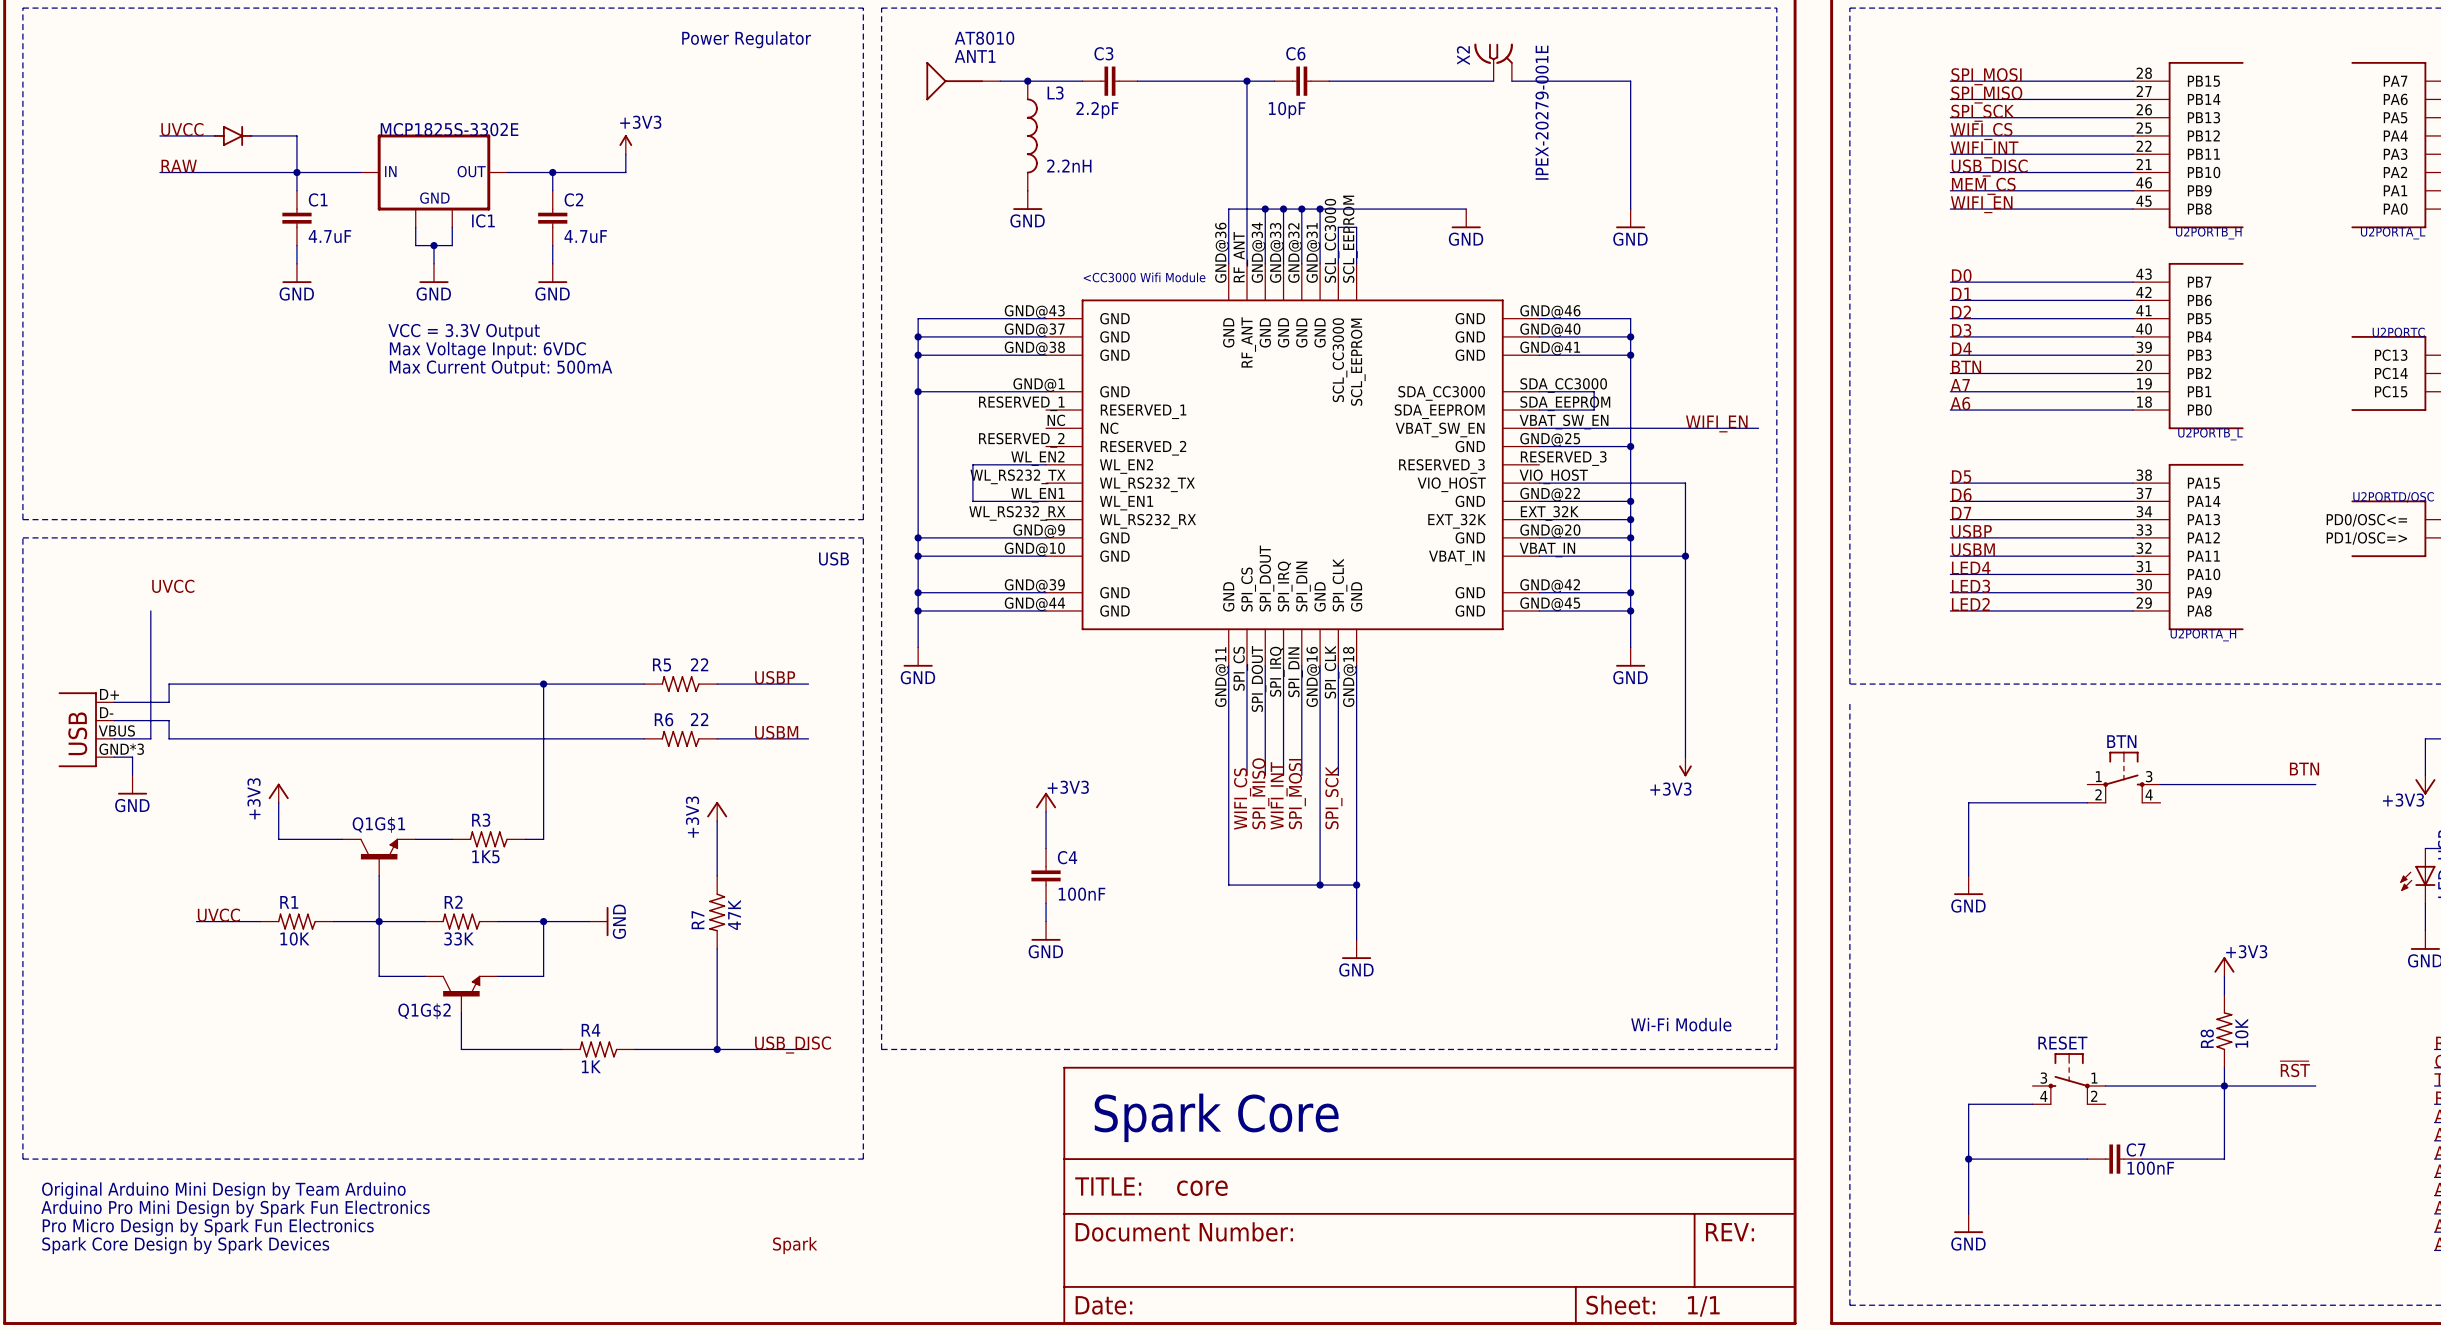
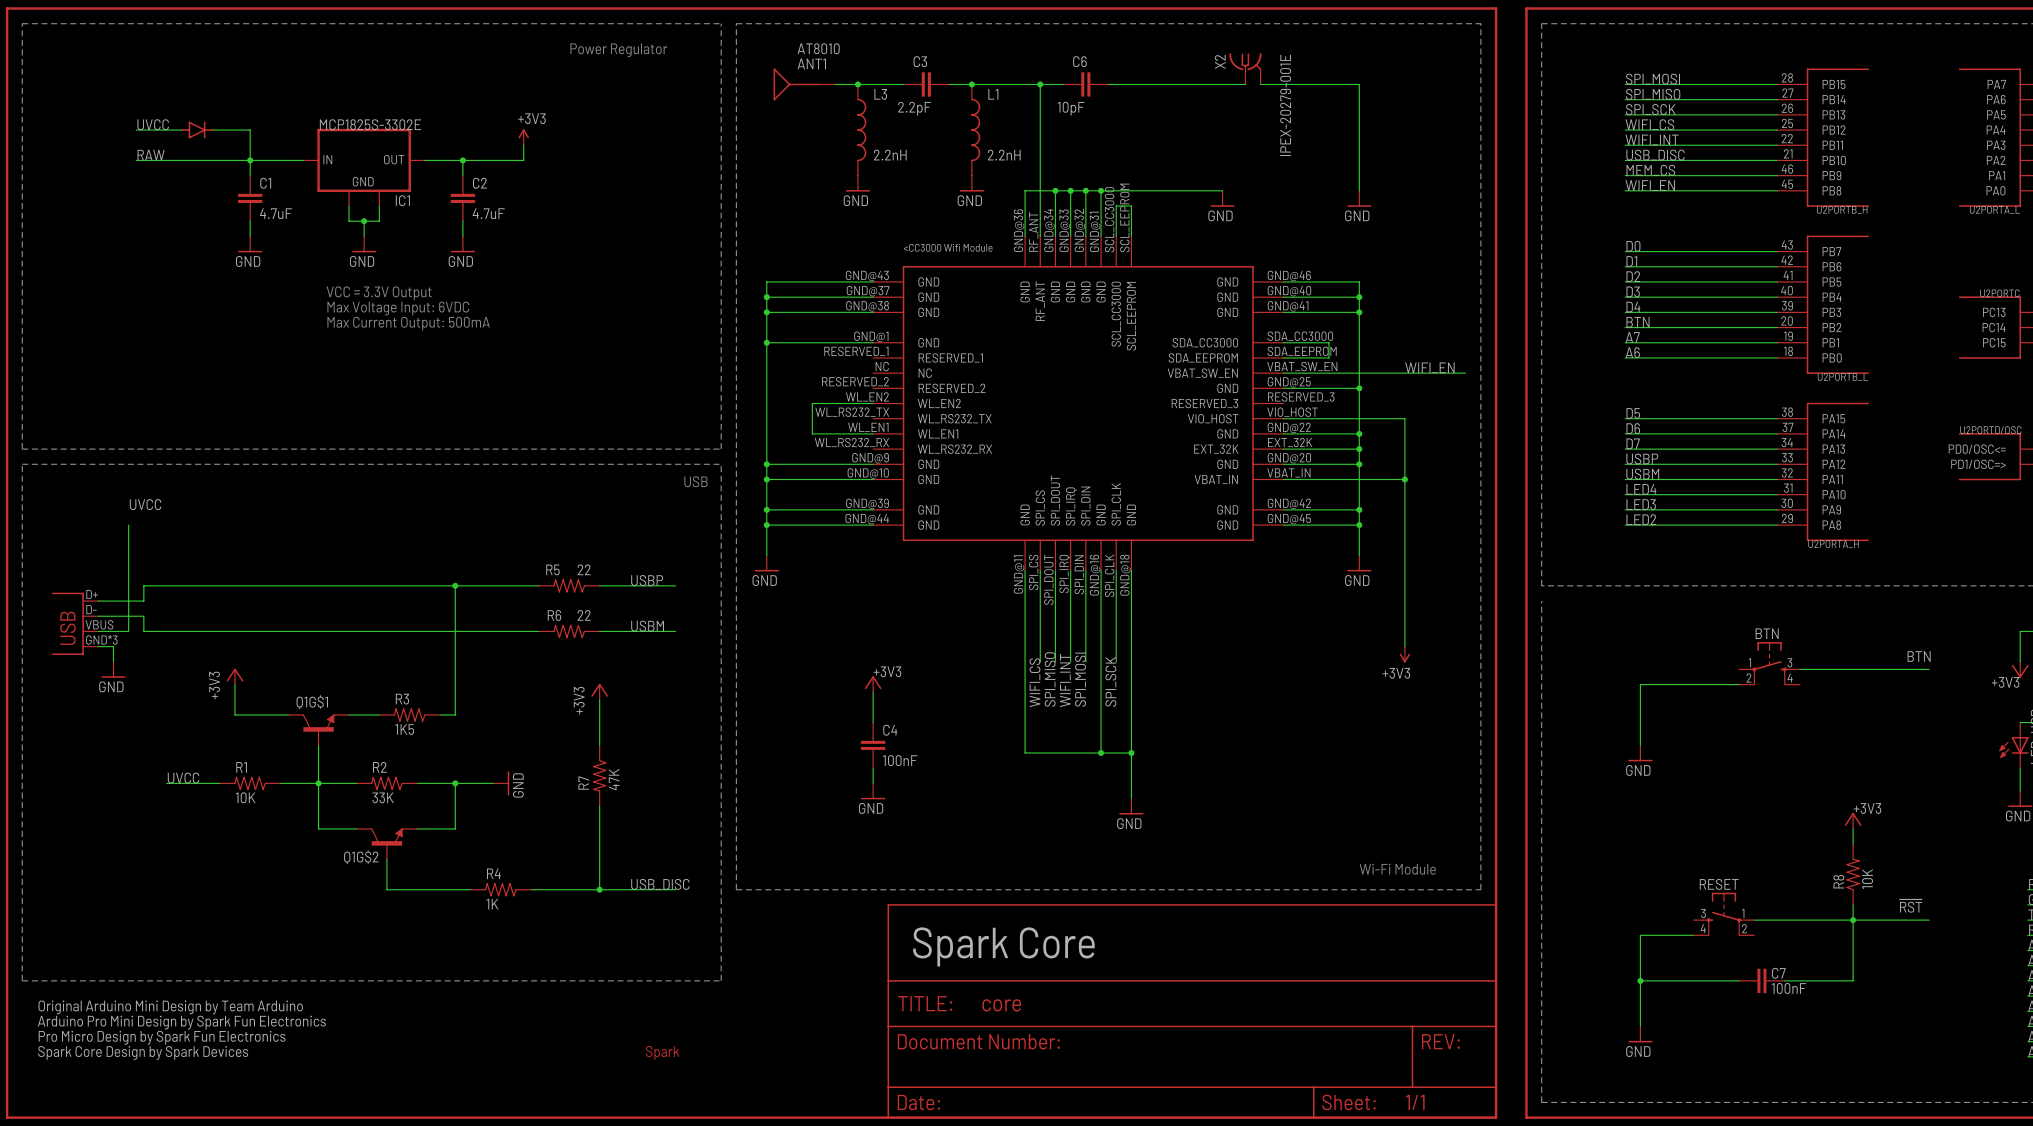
junction: none -> (971, 84)
L1: none -> 2.2nH (975, 130)
power symbol: none -> GND (971, 183)

